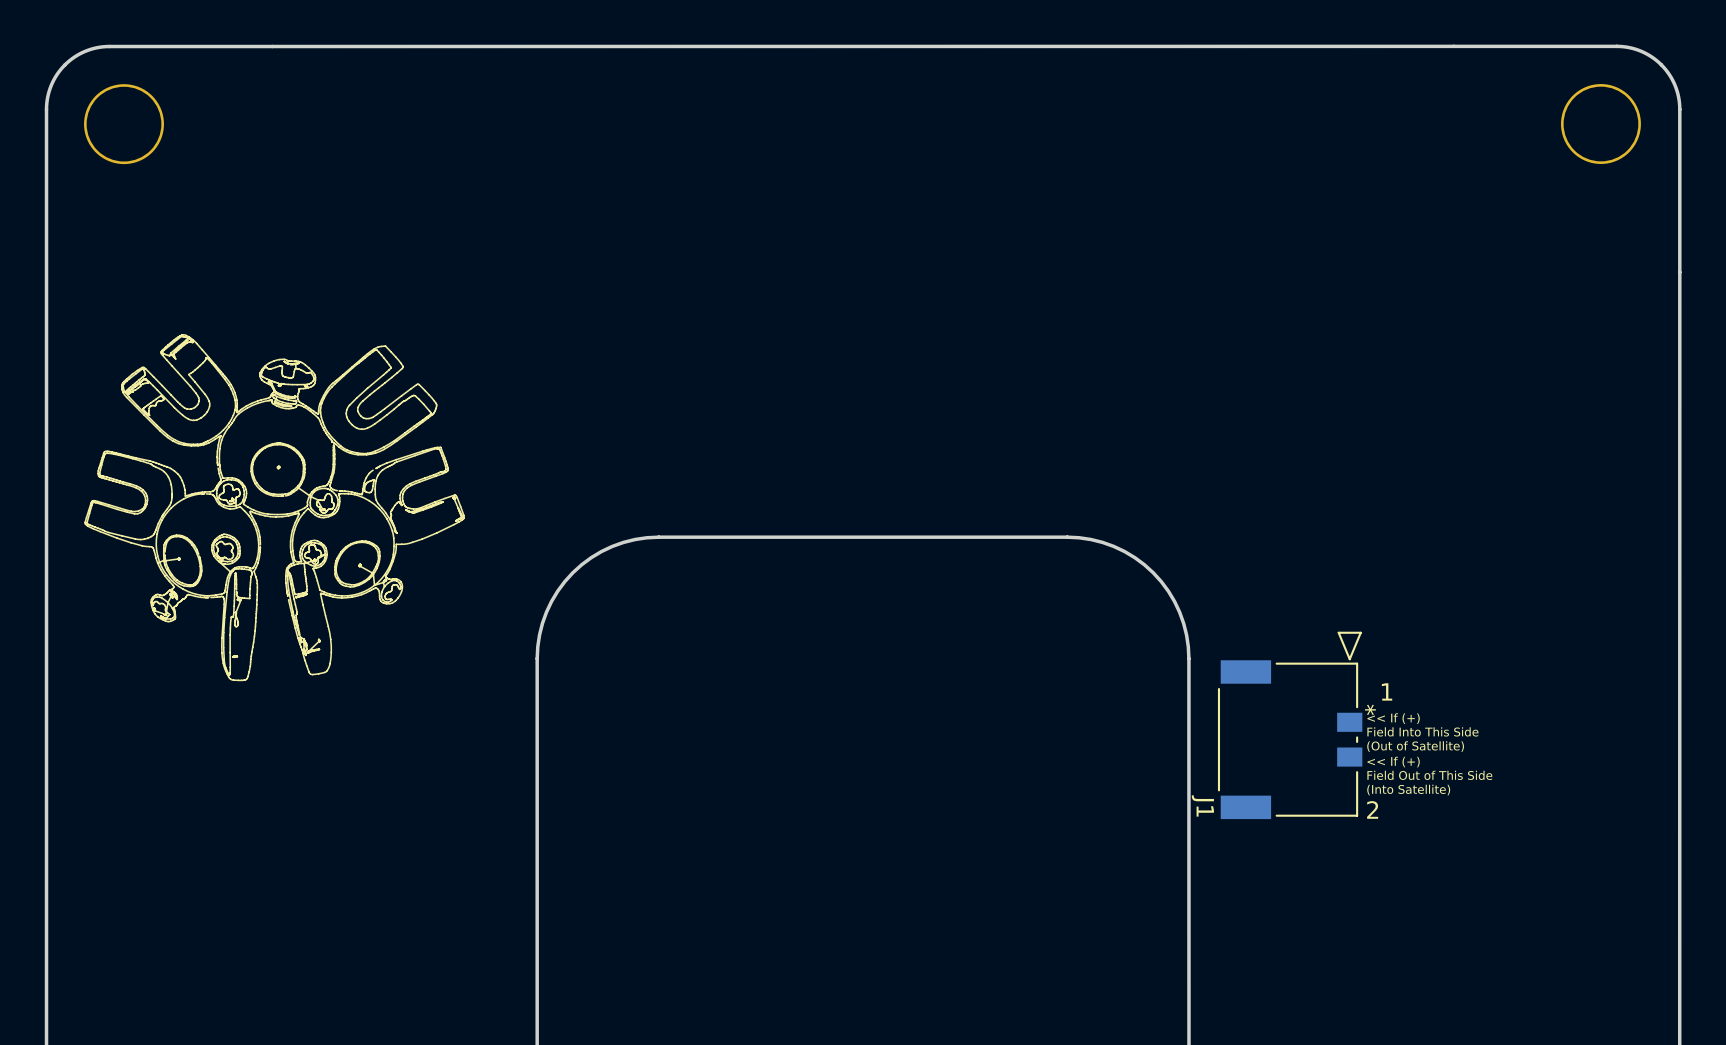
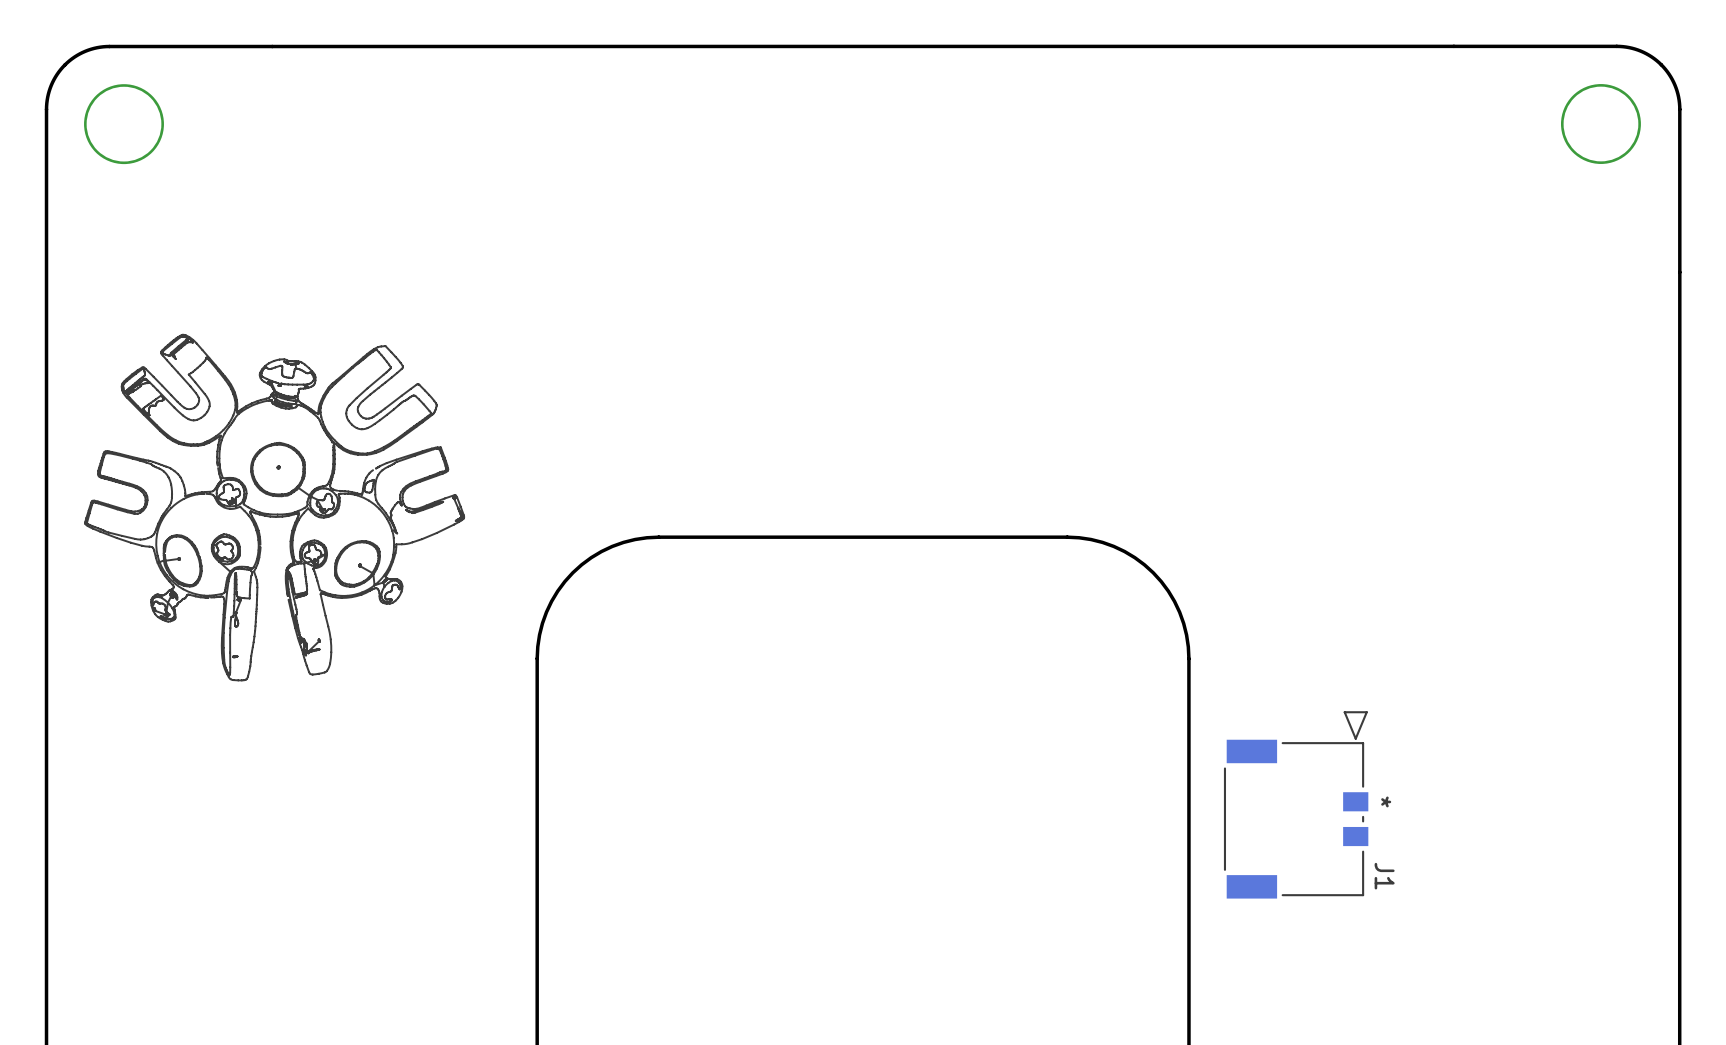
text: 1 (1387, 691) -> none
J1 text position: * (1370, 709) -> * (1386, 801)
text: << If (+) (1393, 718) -> none
J1 position: (1290, 725) -> (1296, 804)
text: Field Into This Side (1422, 731) -> none
text: (Out of Satellite) (1415, 746) -> none
text: << If (+) (1393, 762) -> none
text: Field Out of This Side (1429, 775) -> none
text: (Into Satellite) (1408, 790) -> none
J1 name position: J1 (1202, 805) -> J1 (1384, 876)
text: 2 (1372, 809) -> none

